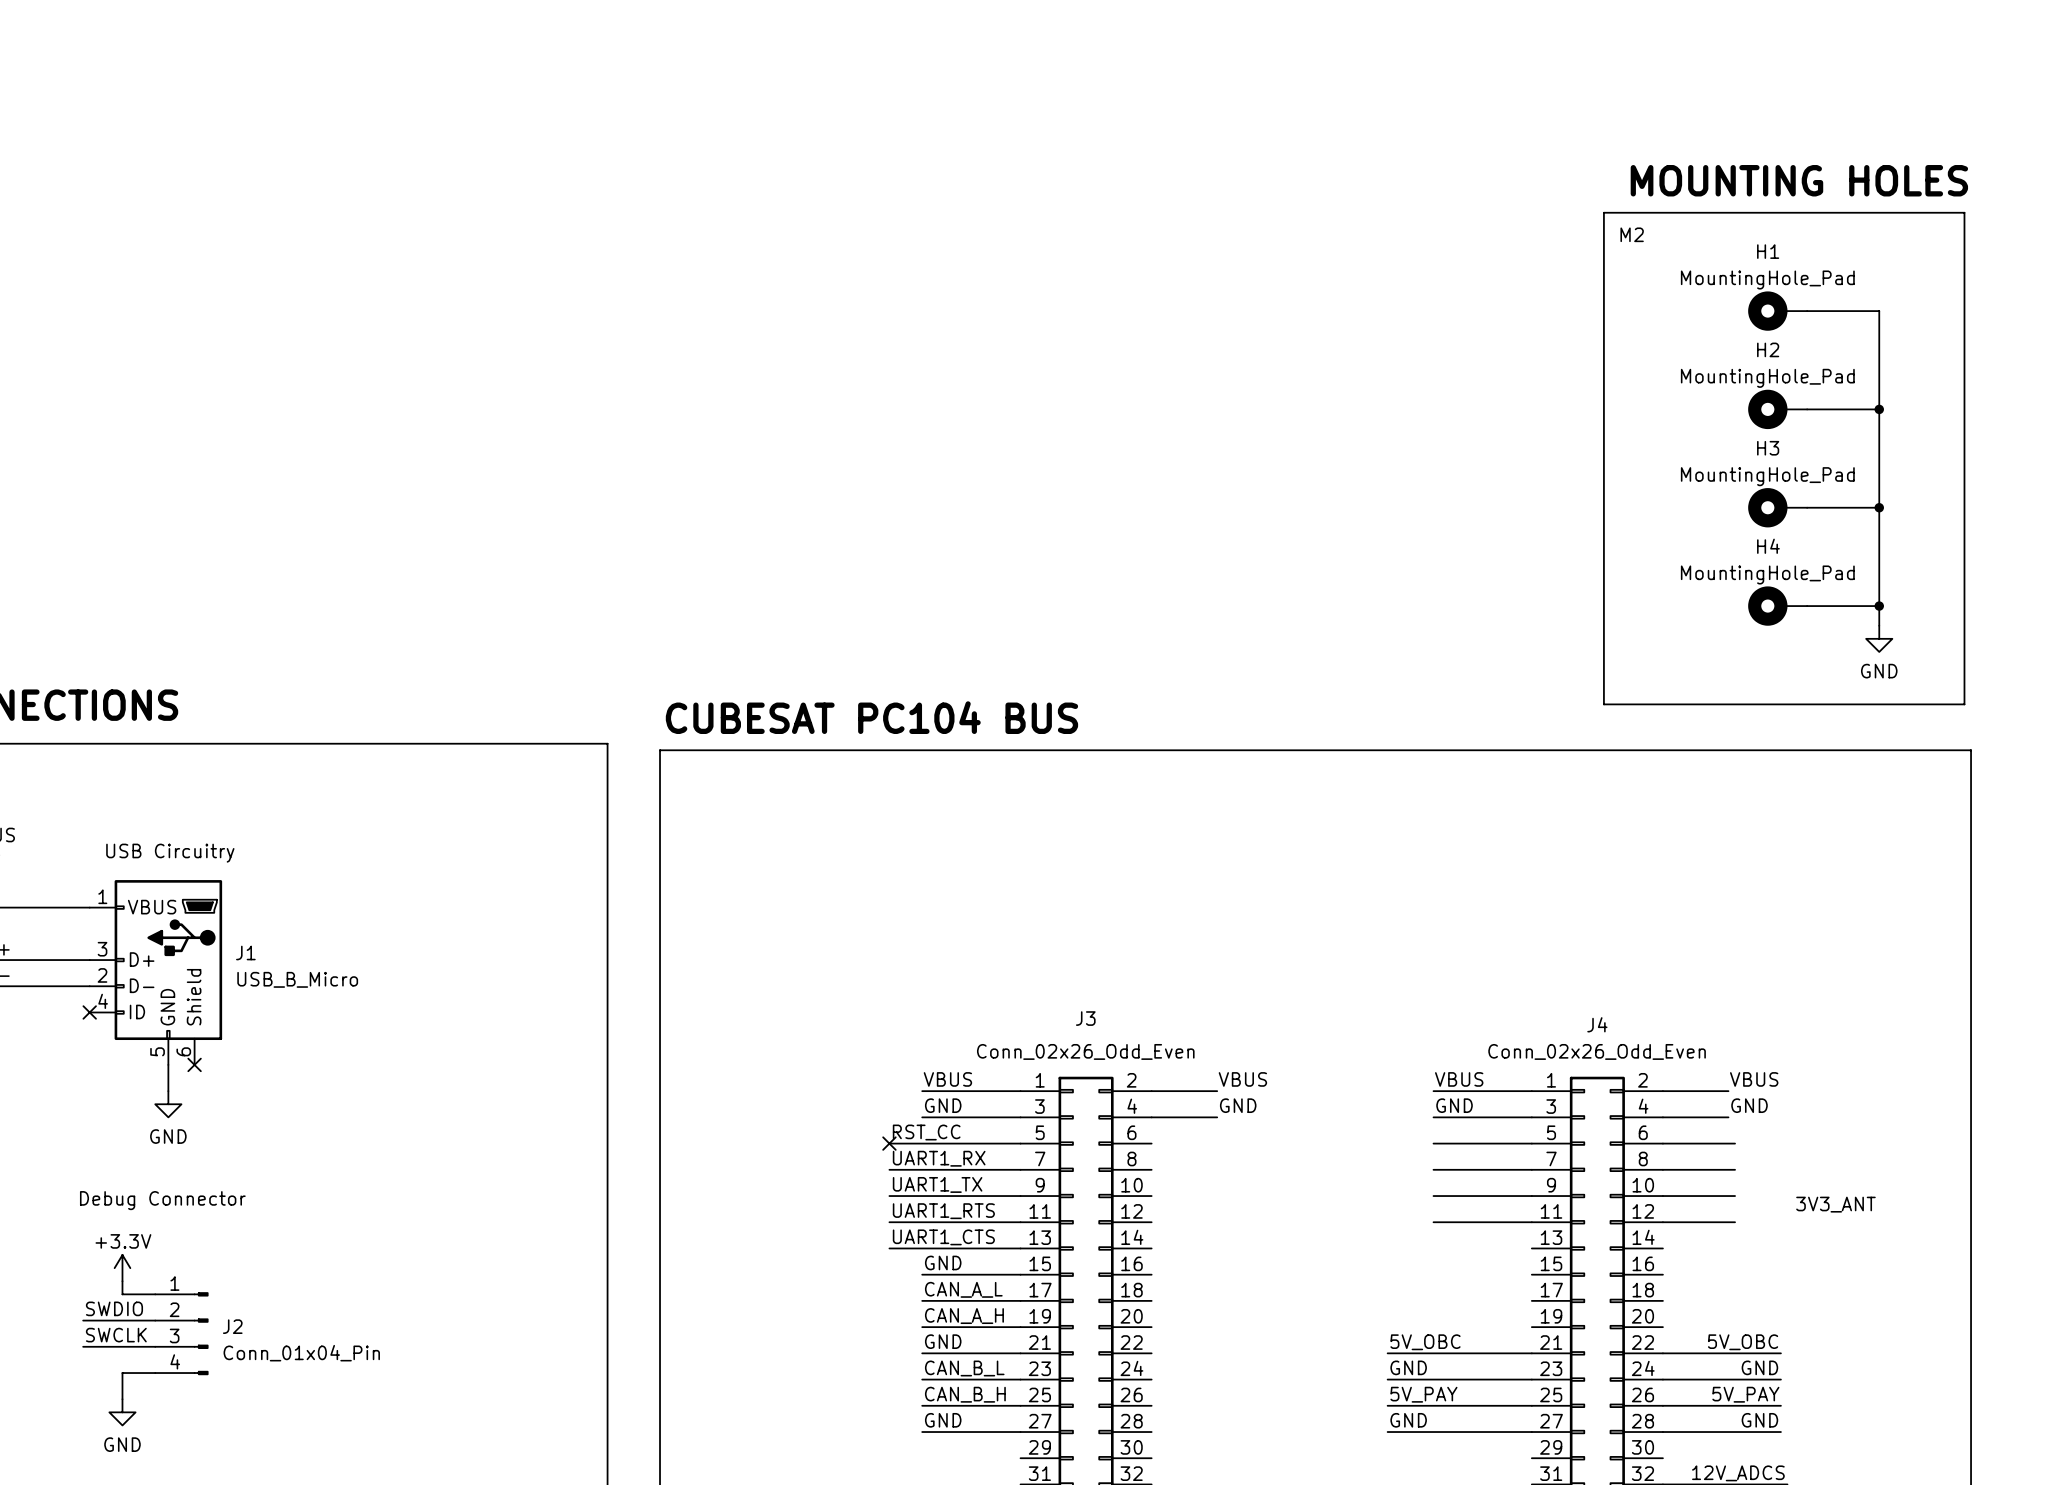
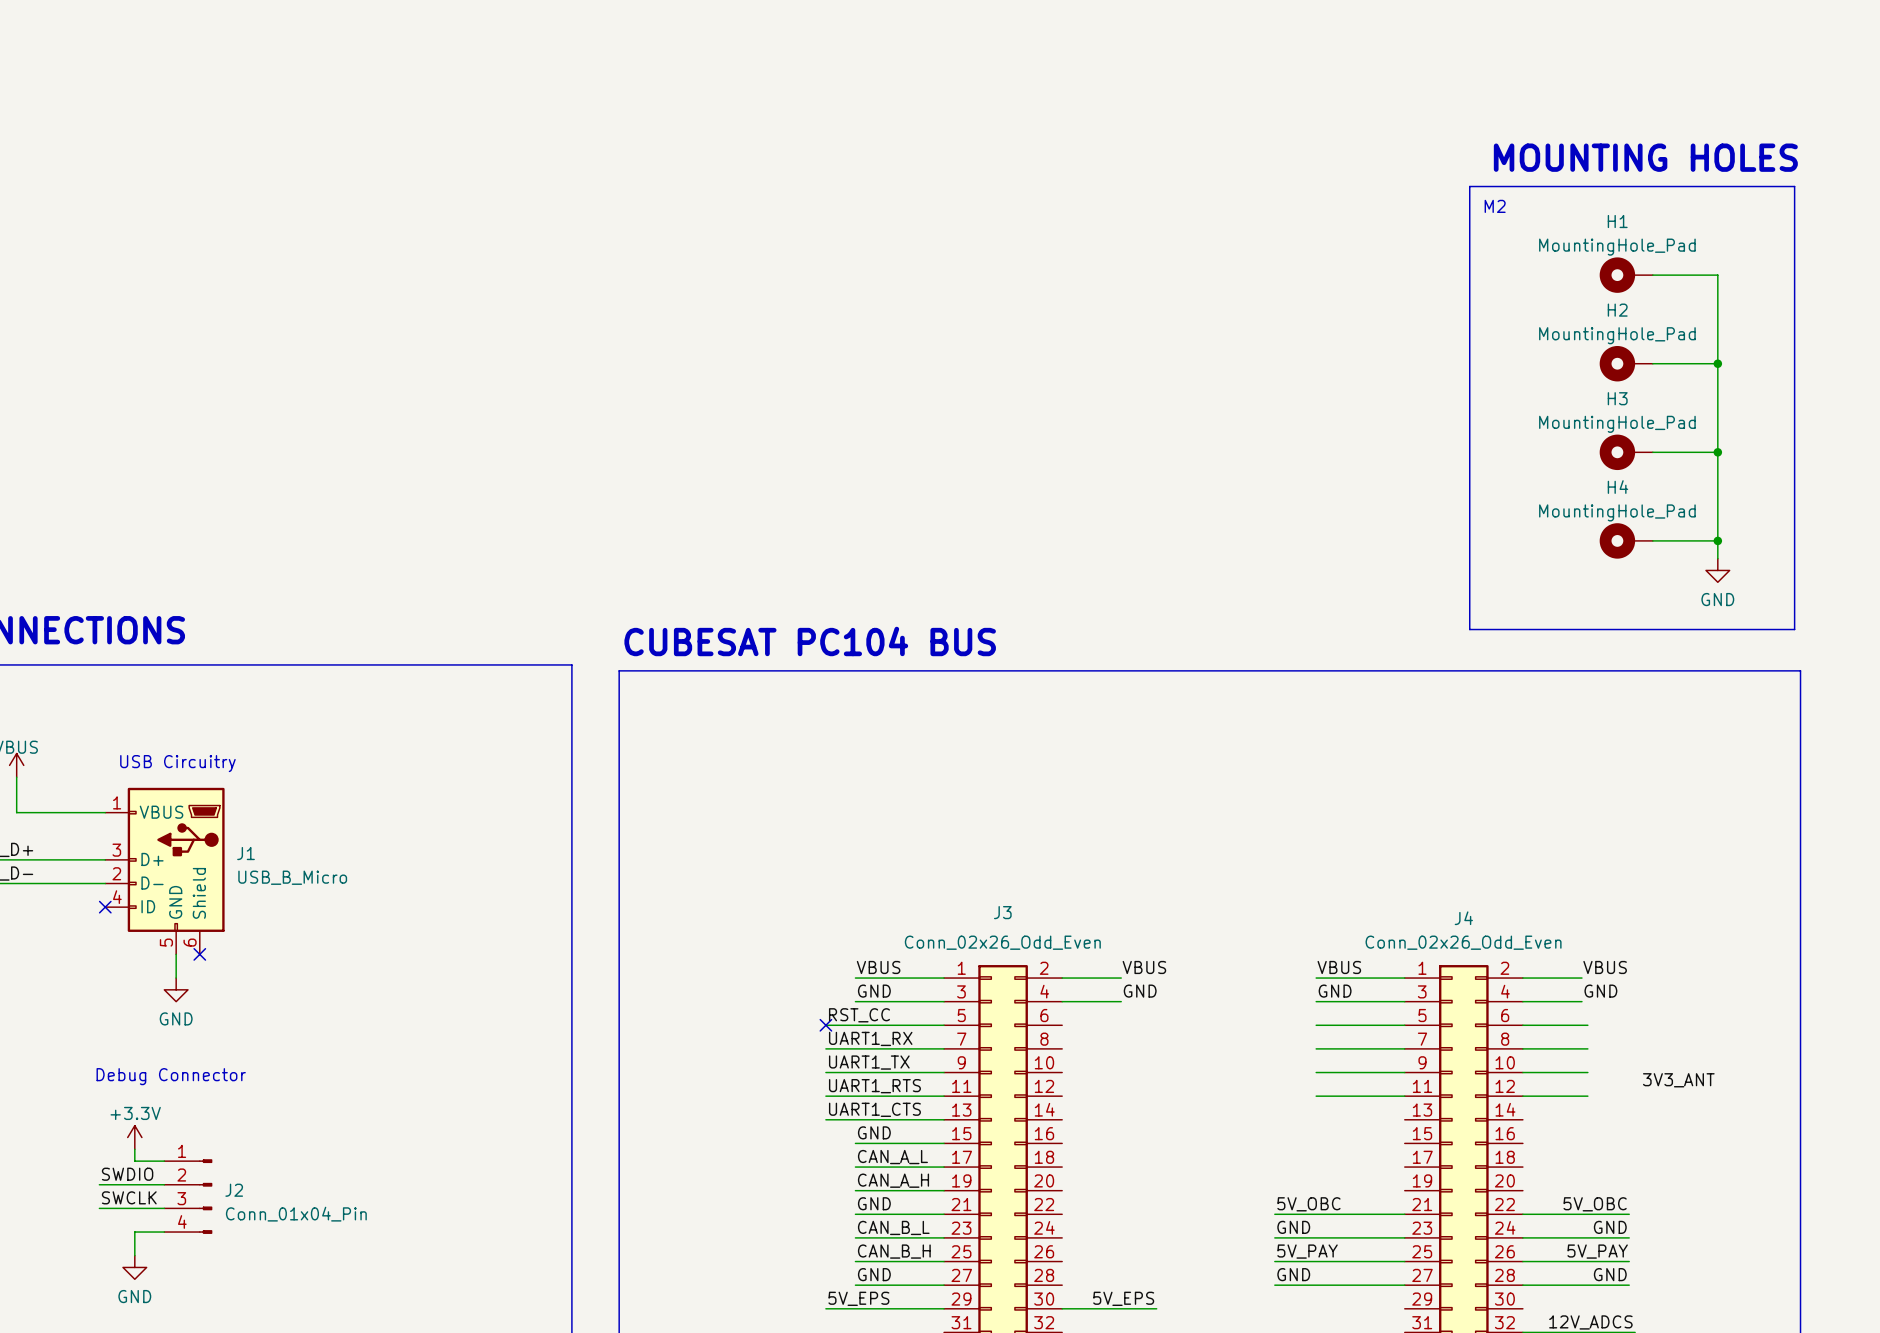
label: none -> 5V_EPS (858, 1298)
label: none -> 5V_EPS (1123, 1298)
wire: none -> (825, 1308) (944, 1308)
wire: none -> (1062, 1308) (1156, 1308)

